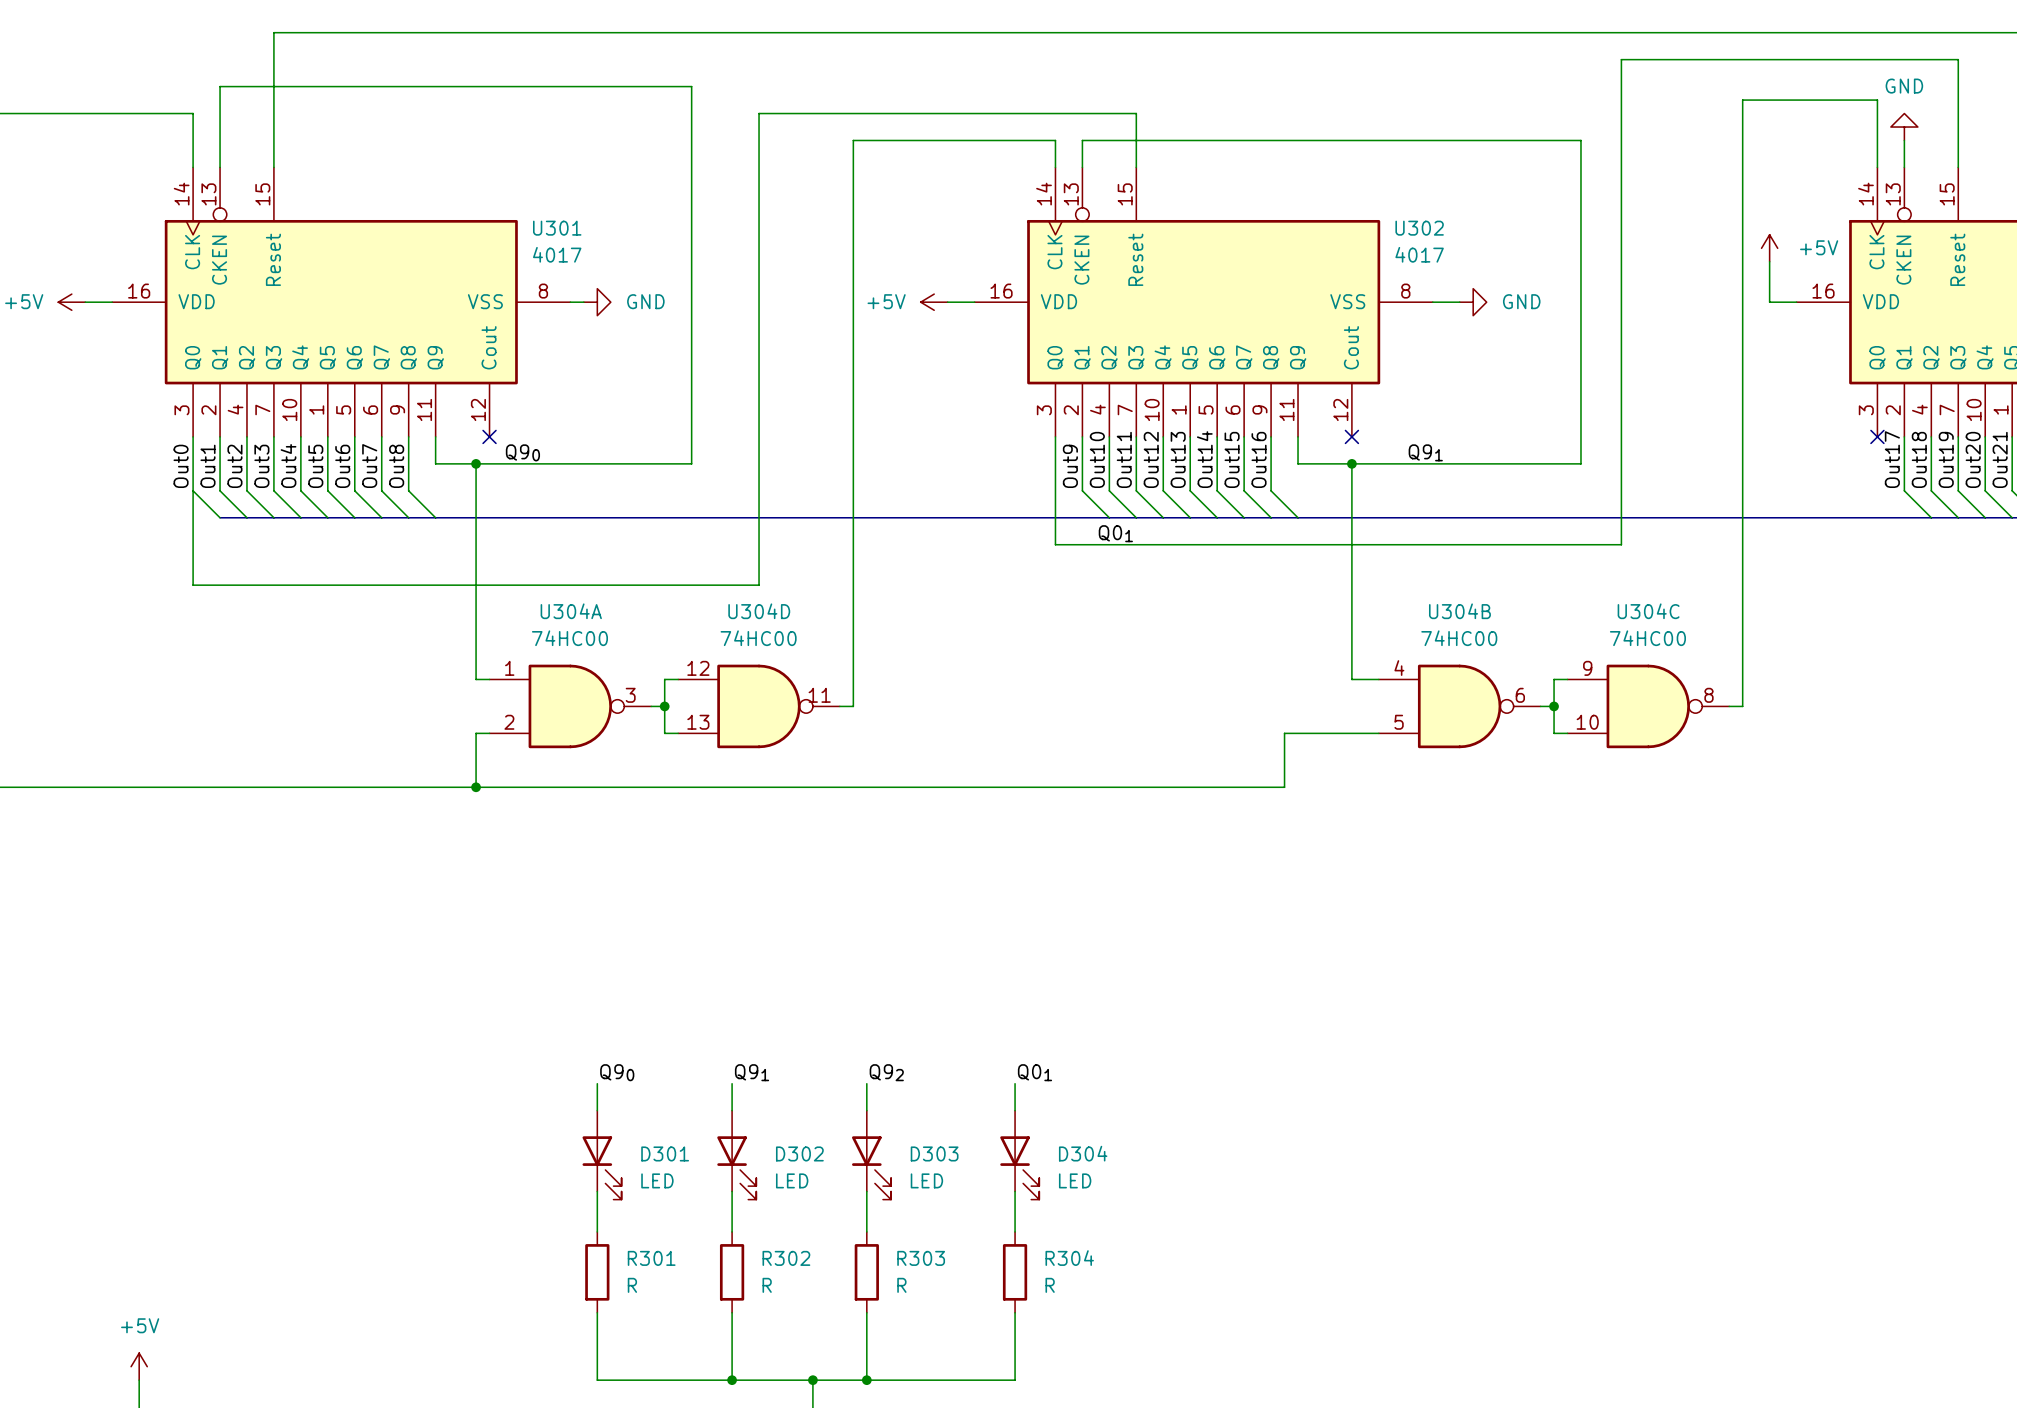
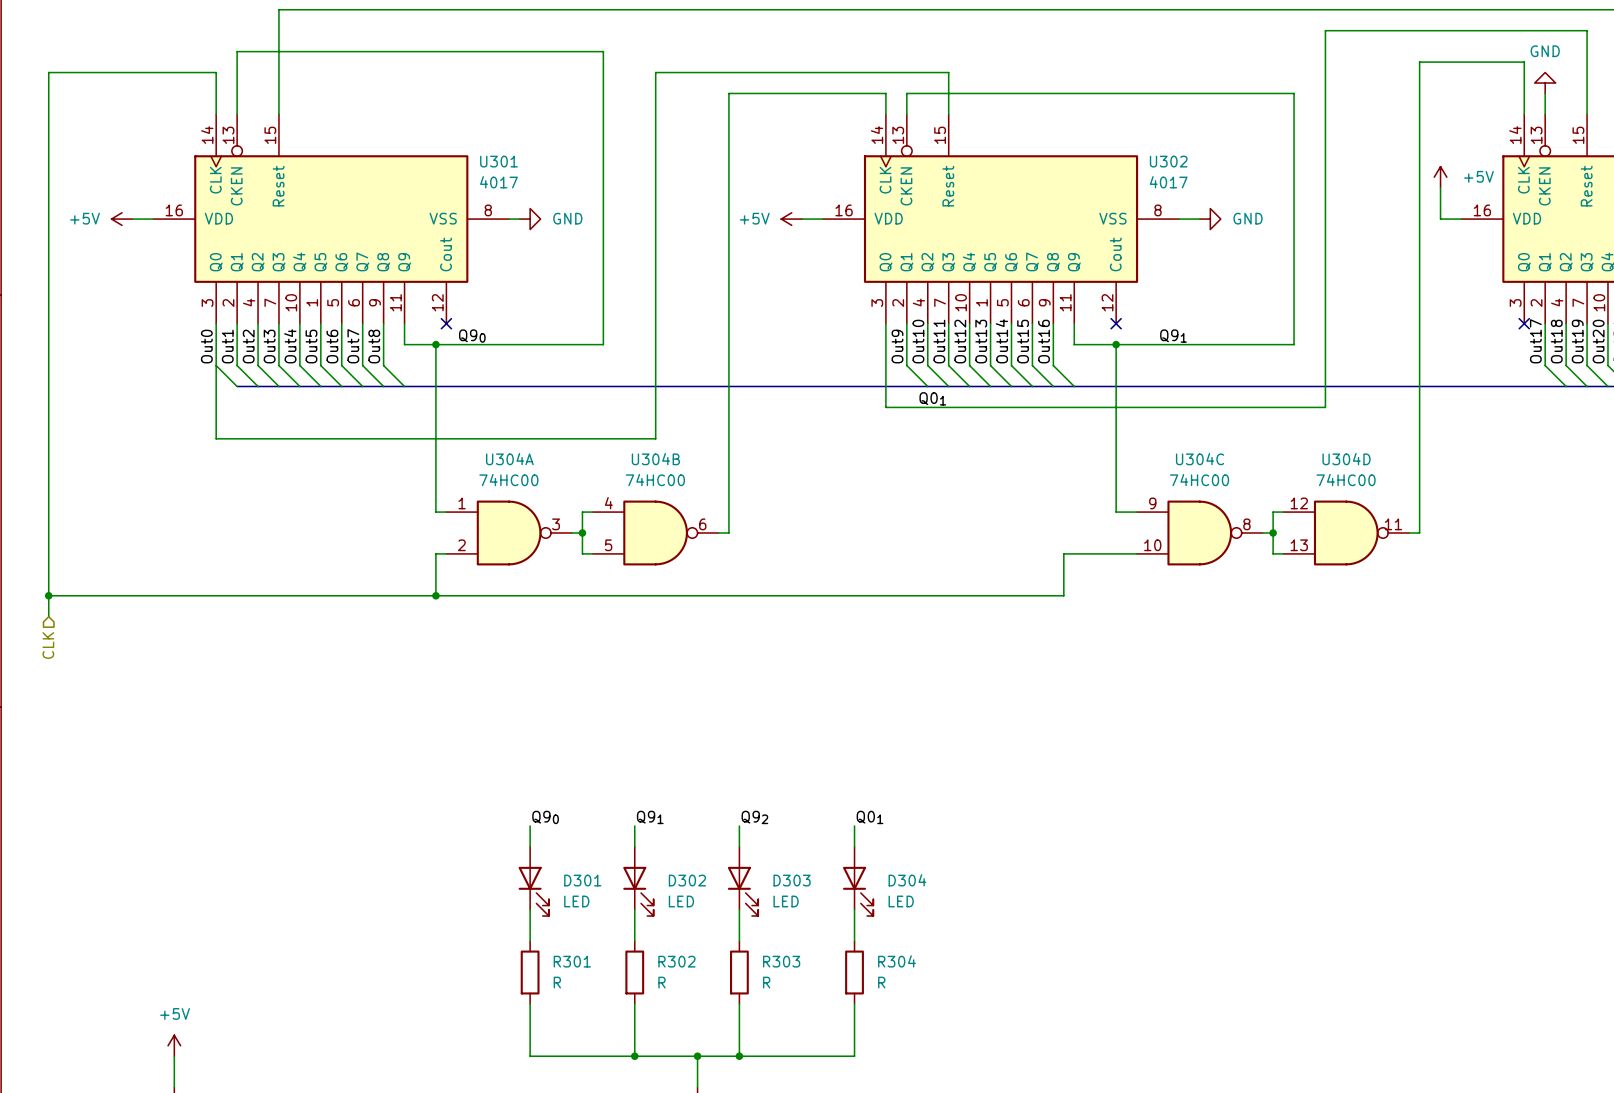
U304D position: (759, 706) -> (1346, 532)
U304B position: (1459, 706) -> (655, 532)
U304C position: (1648, 706) -> (1199, 532)

